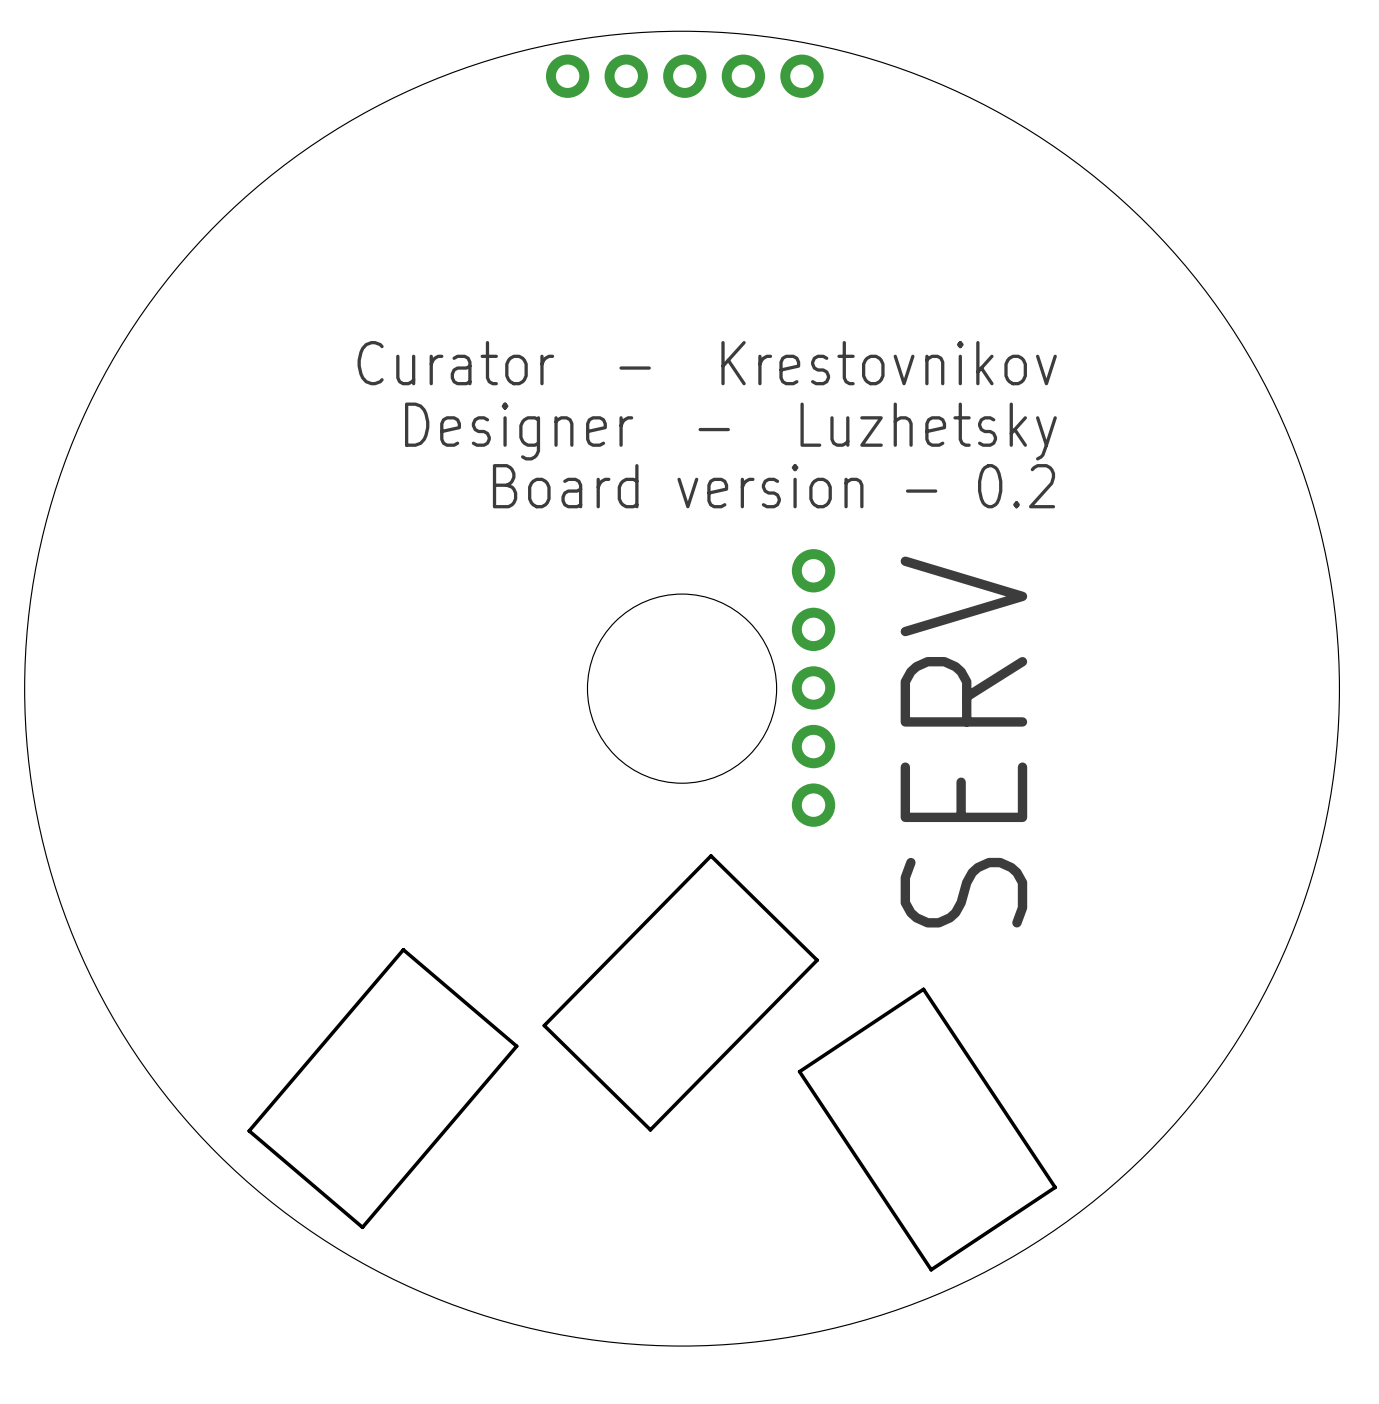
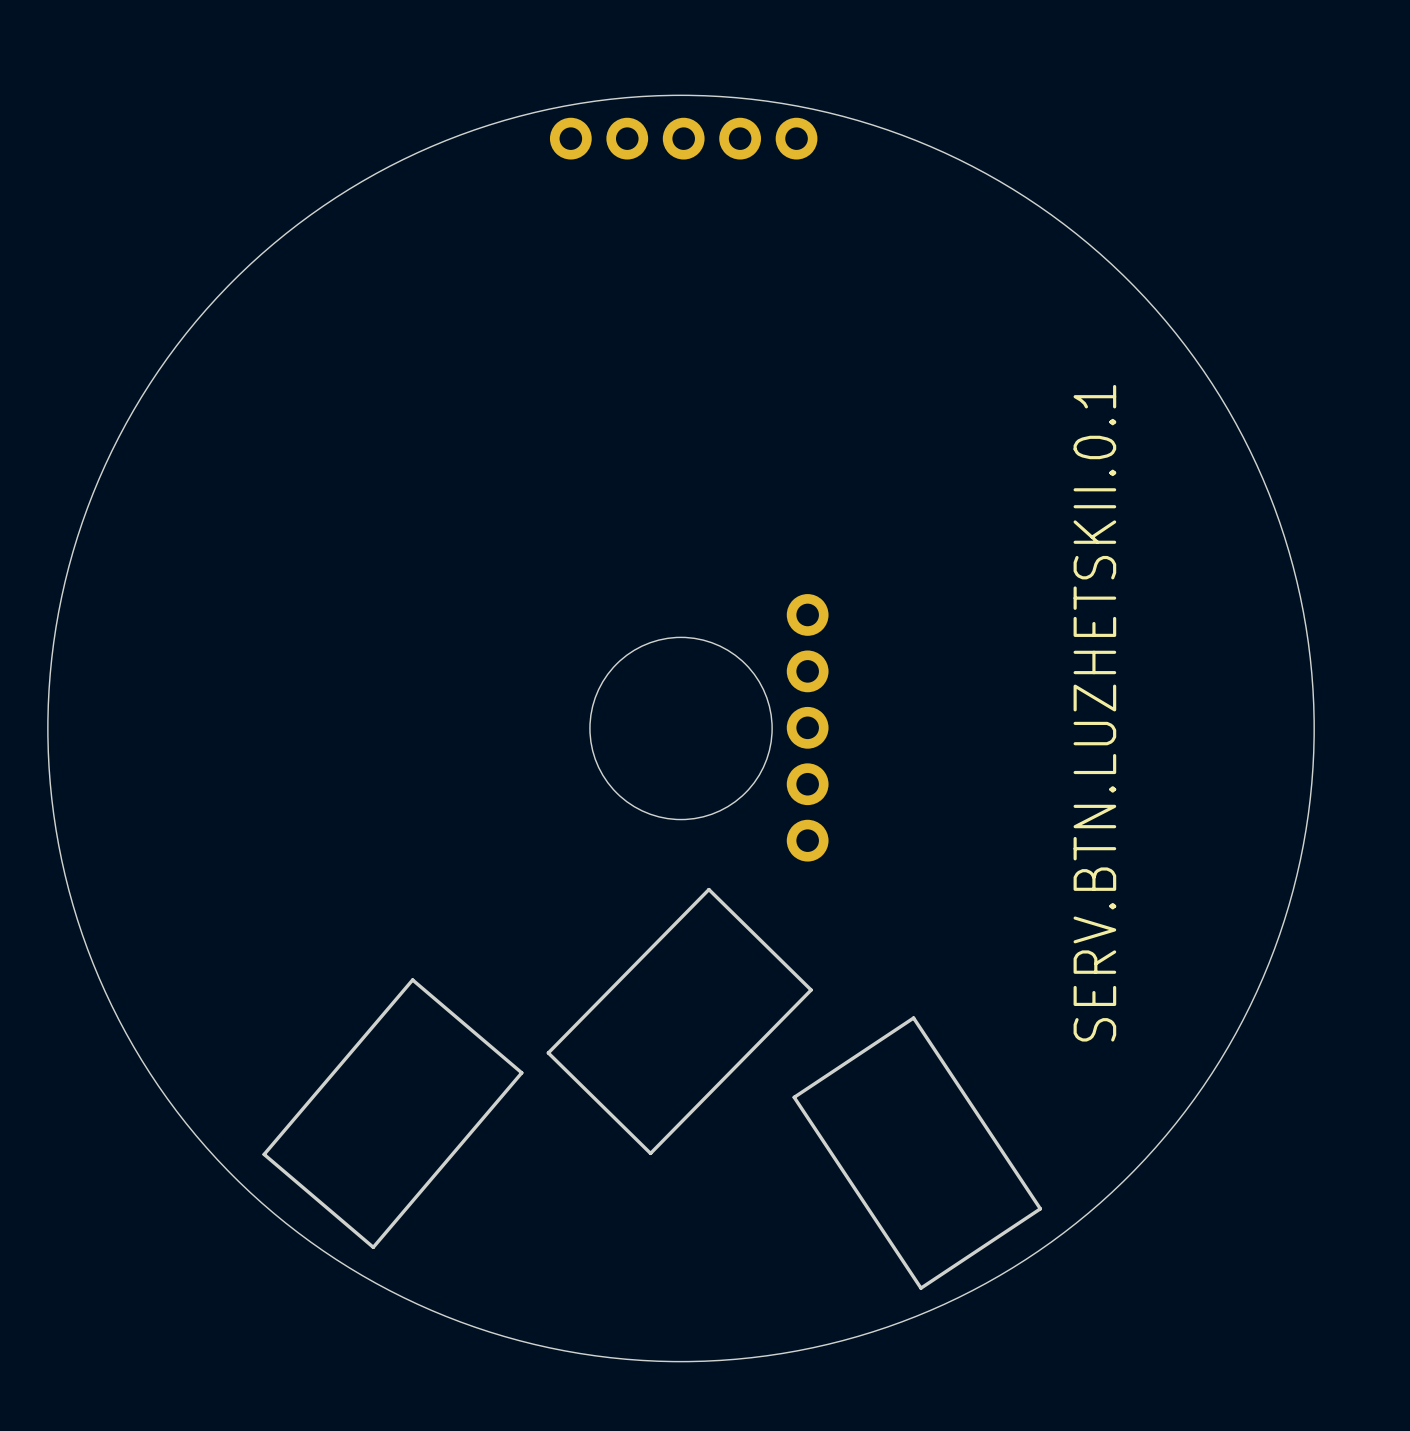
text: Curator - Krestovnikov (707, 363) -> none
text: Designer - Luzhetsky (730, 431) -> none
text: Board version - 0.2 (773, 486) -> none
text: none -> SERV.BTN.LUZHETSKII.0.1 (1094, 713)
text: SERV (963, 742) -> none

